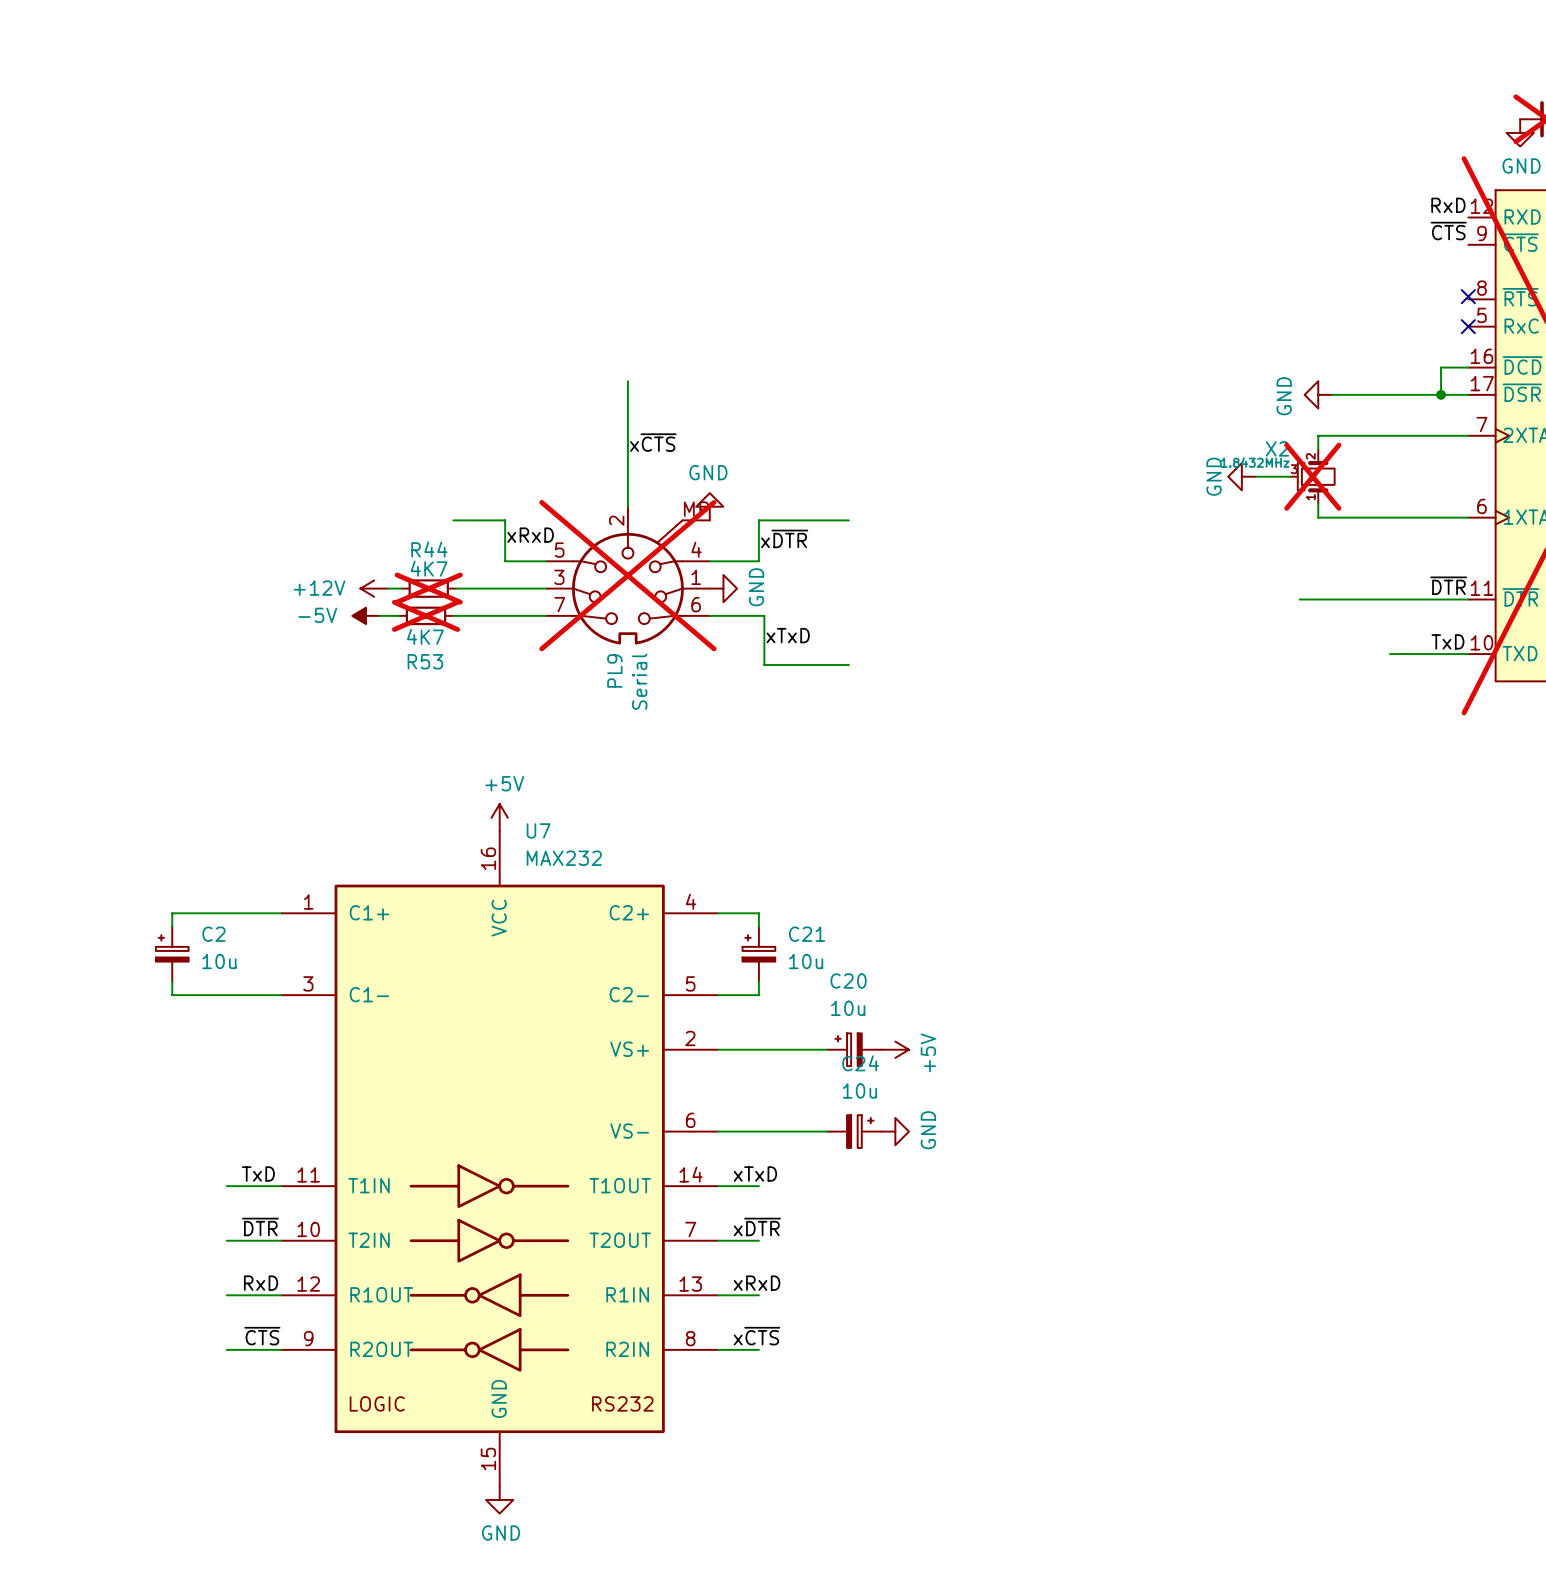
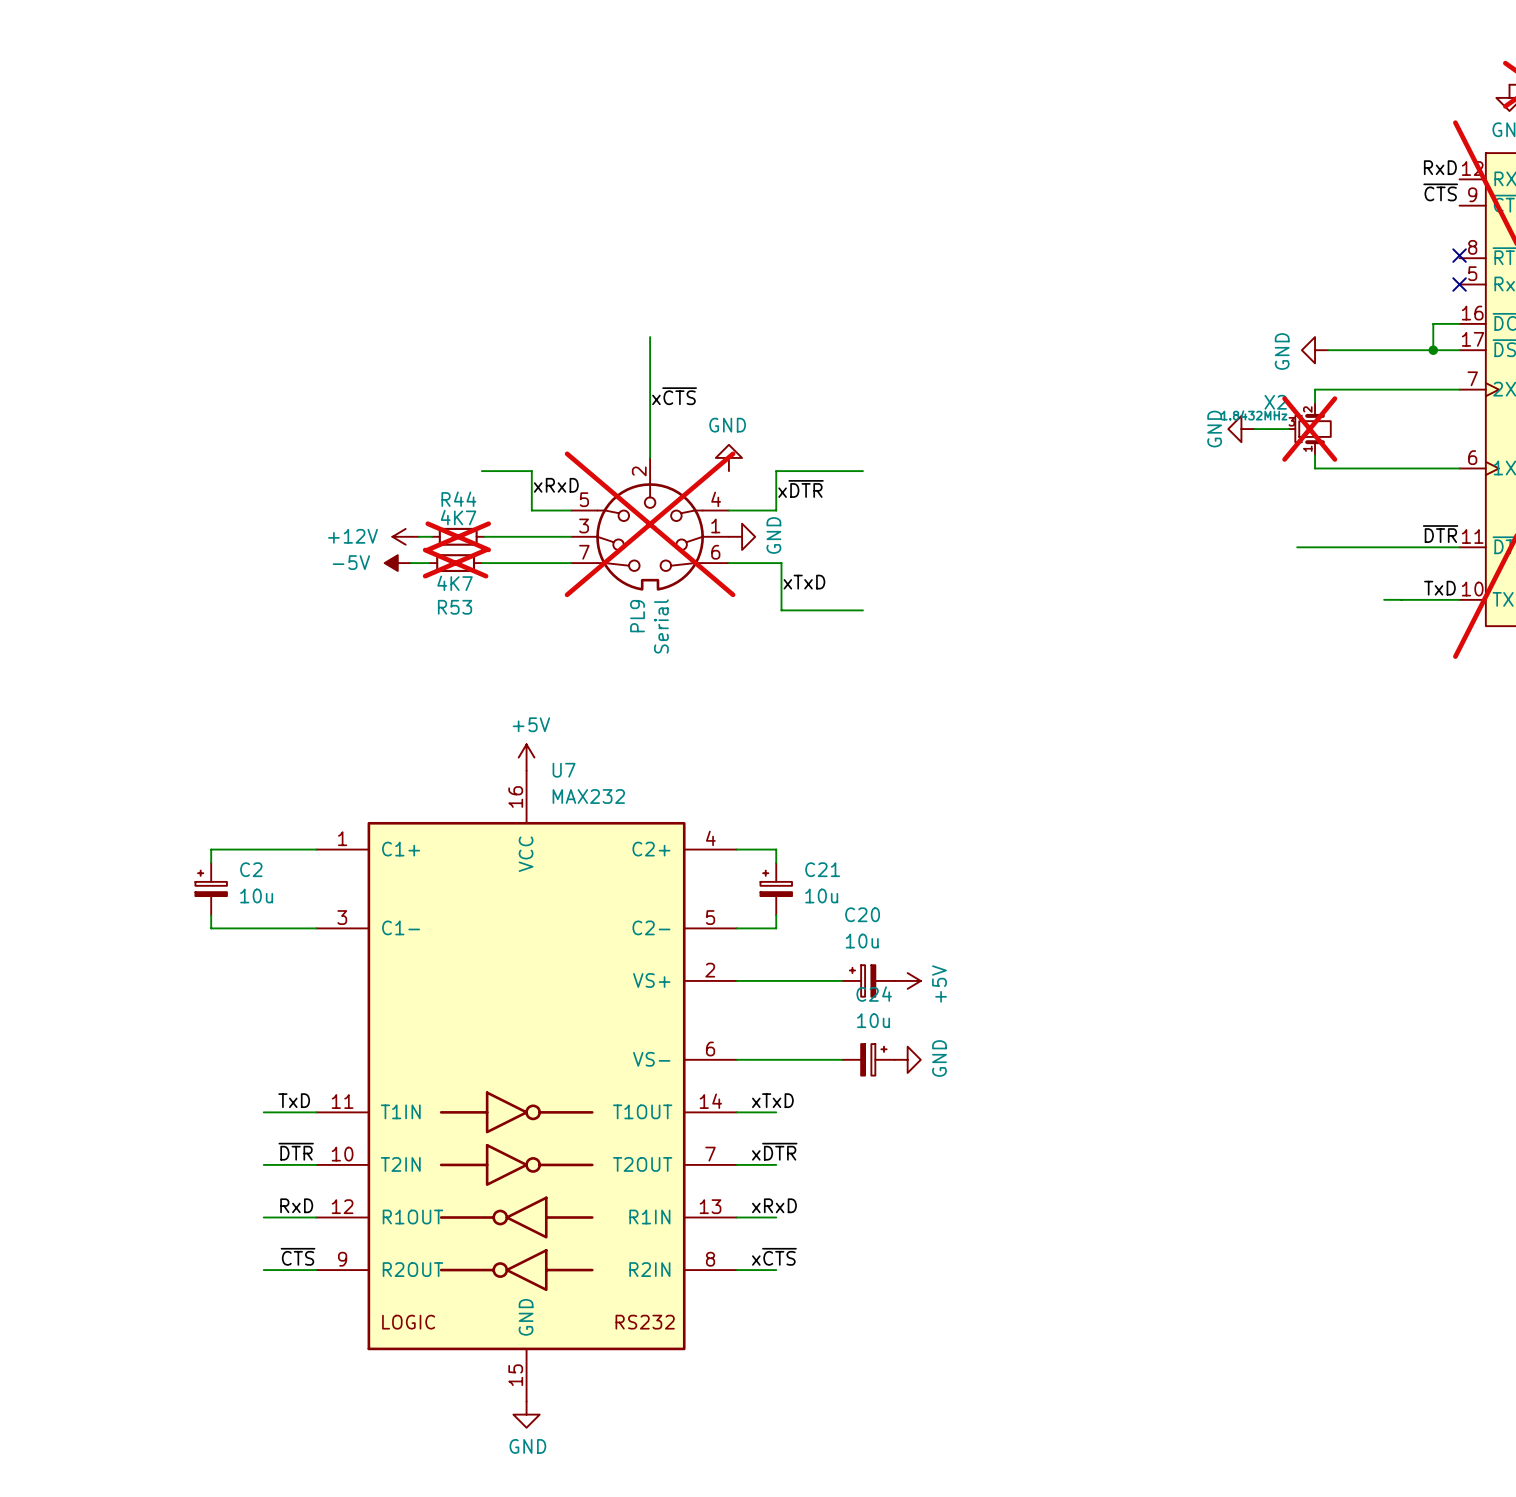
PL9 symbol: [546, 506, 710, 645] -> [571, 457, 729, 591]

